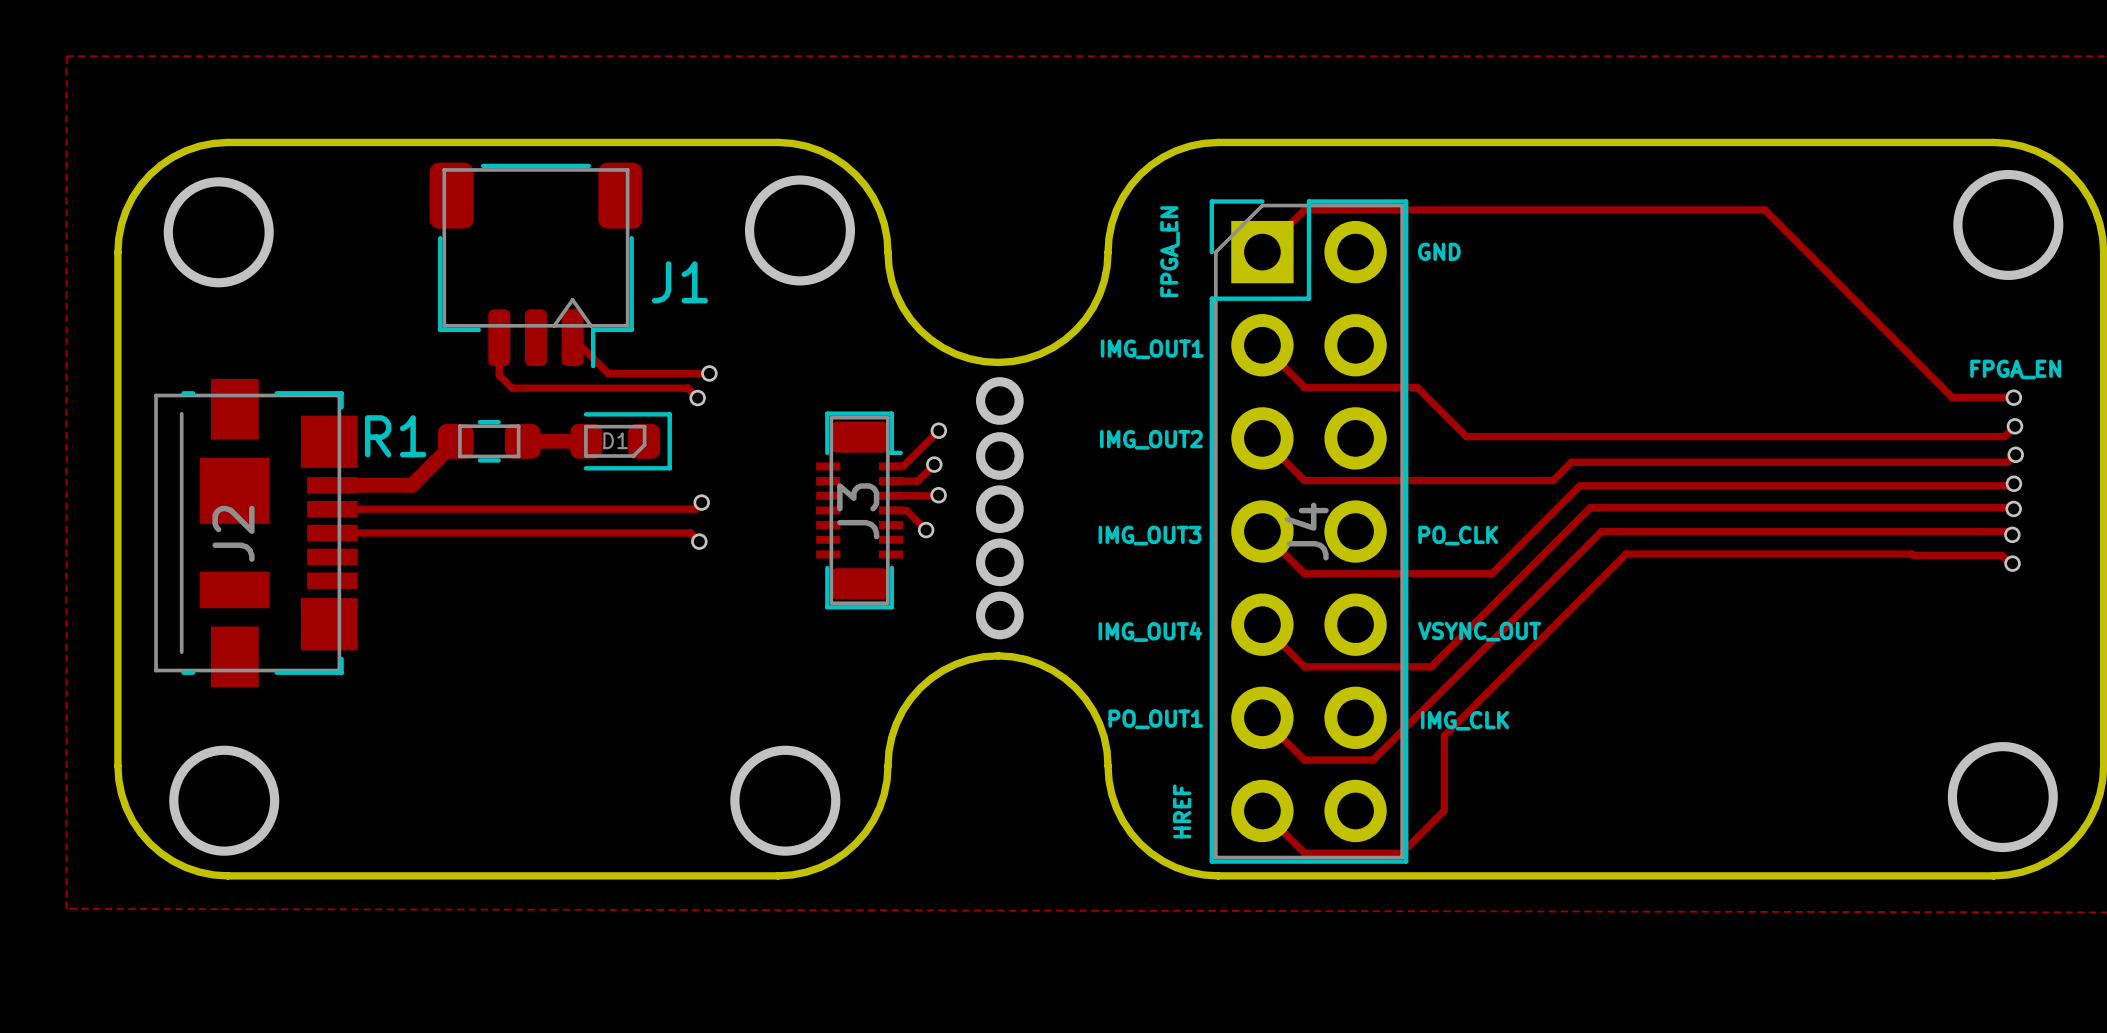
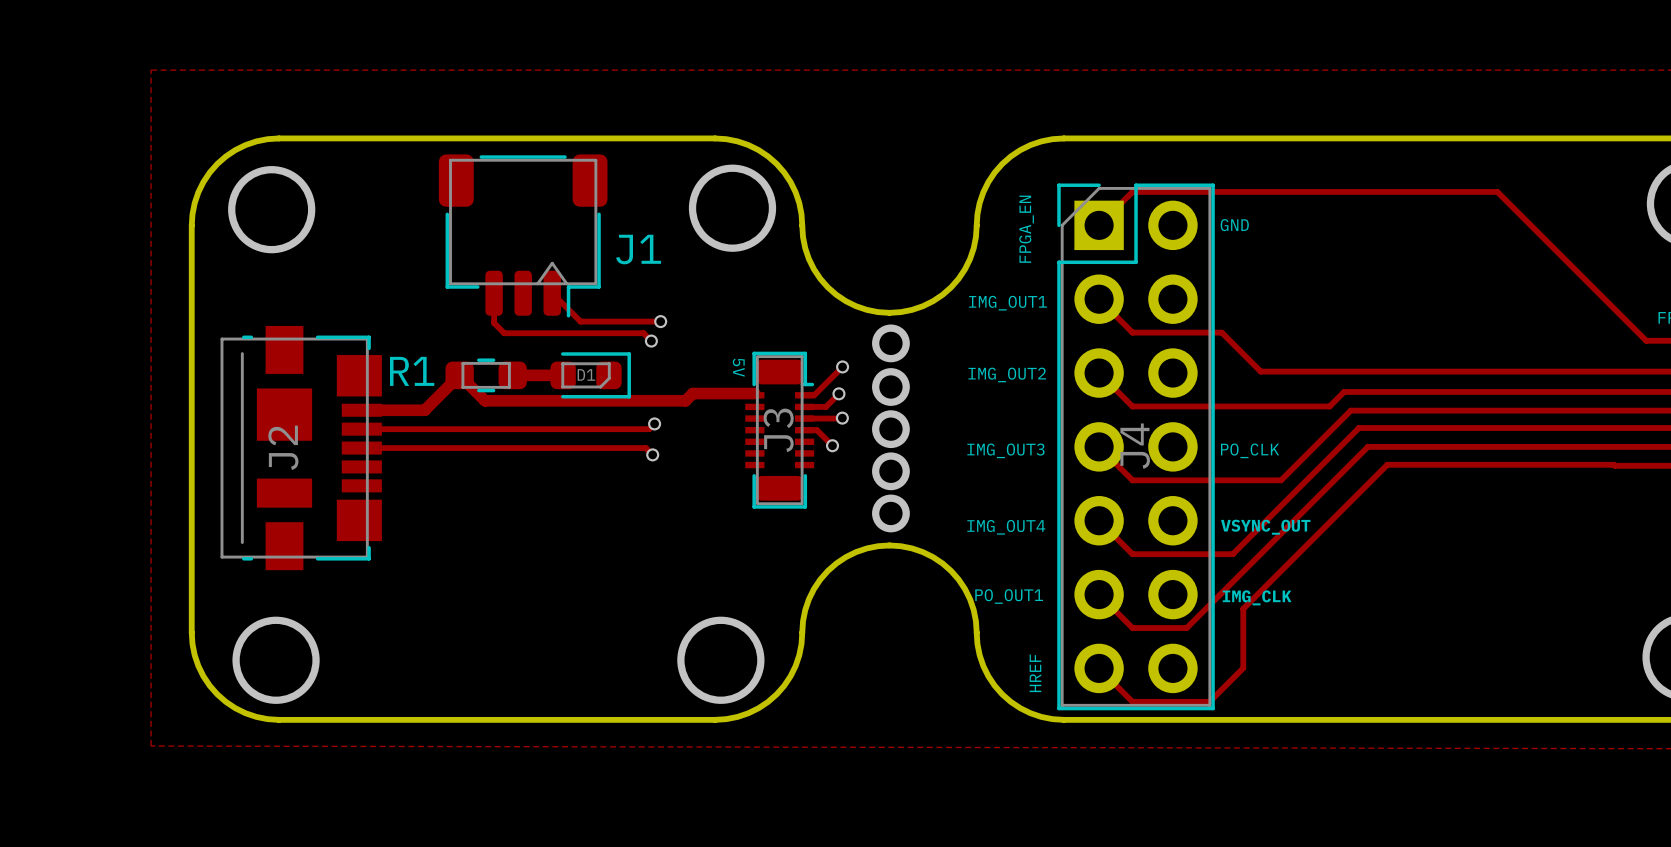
text: none -> 5V (738, 367)
track: none -> (459, 375) (485, 400) (685, 400) (692, 393) (754, 393)

